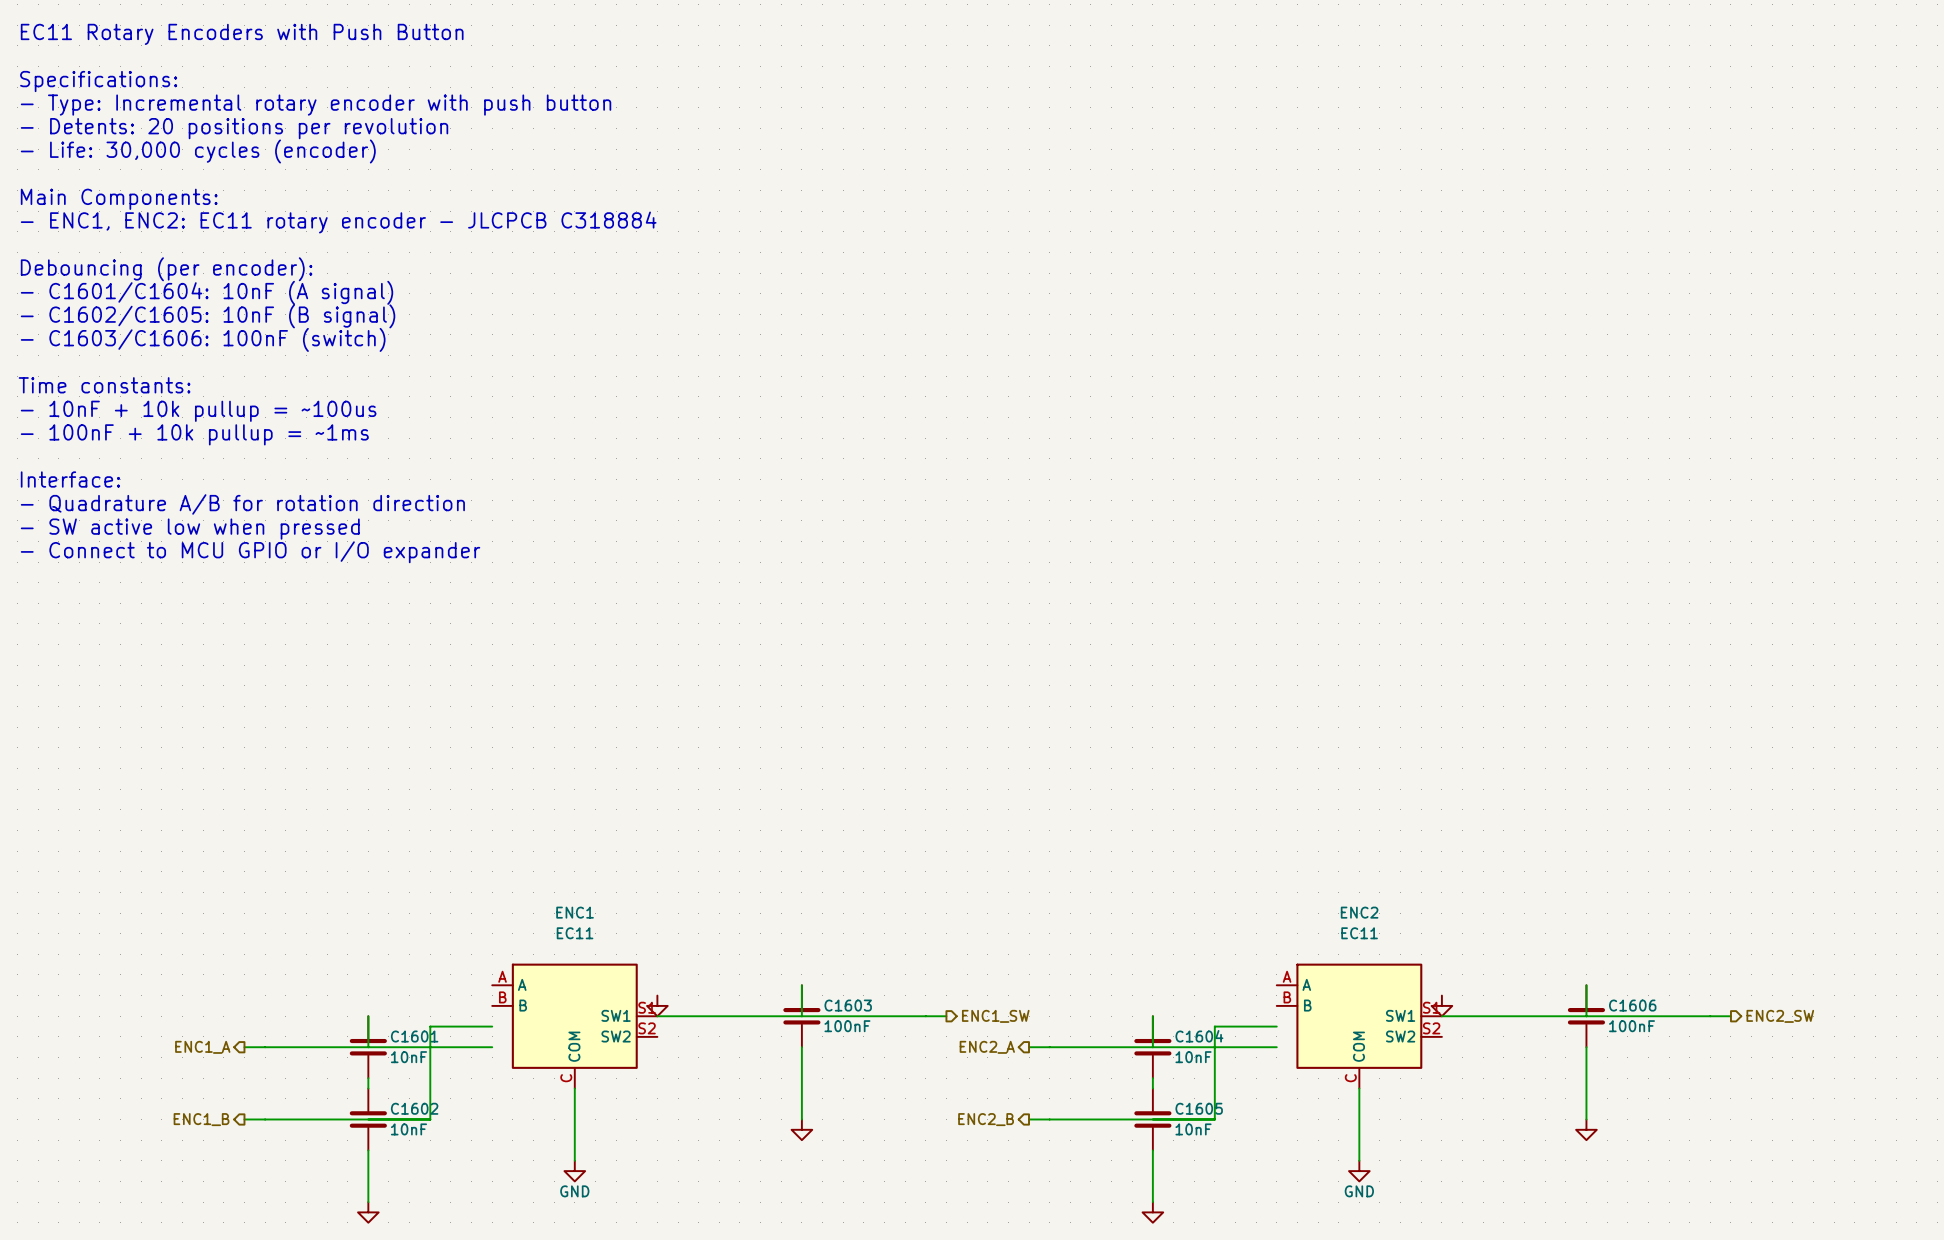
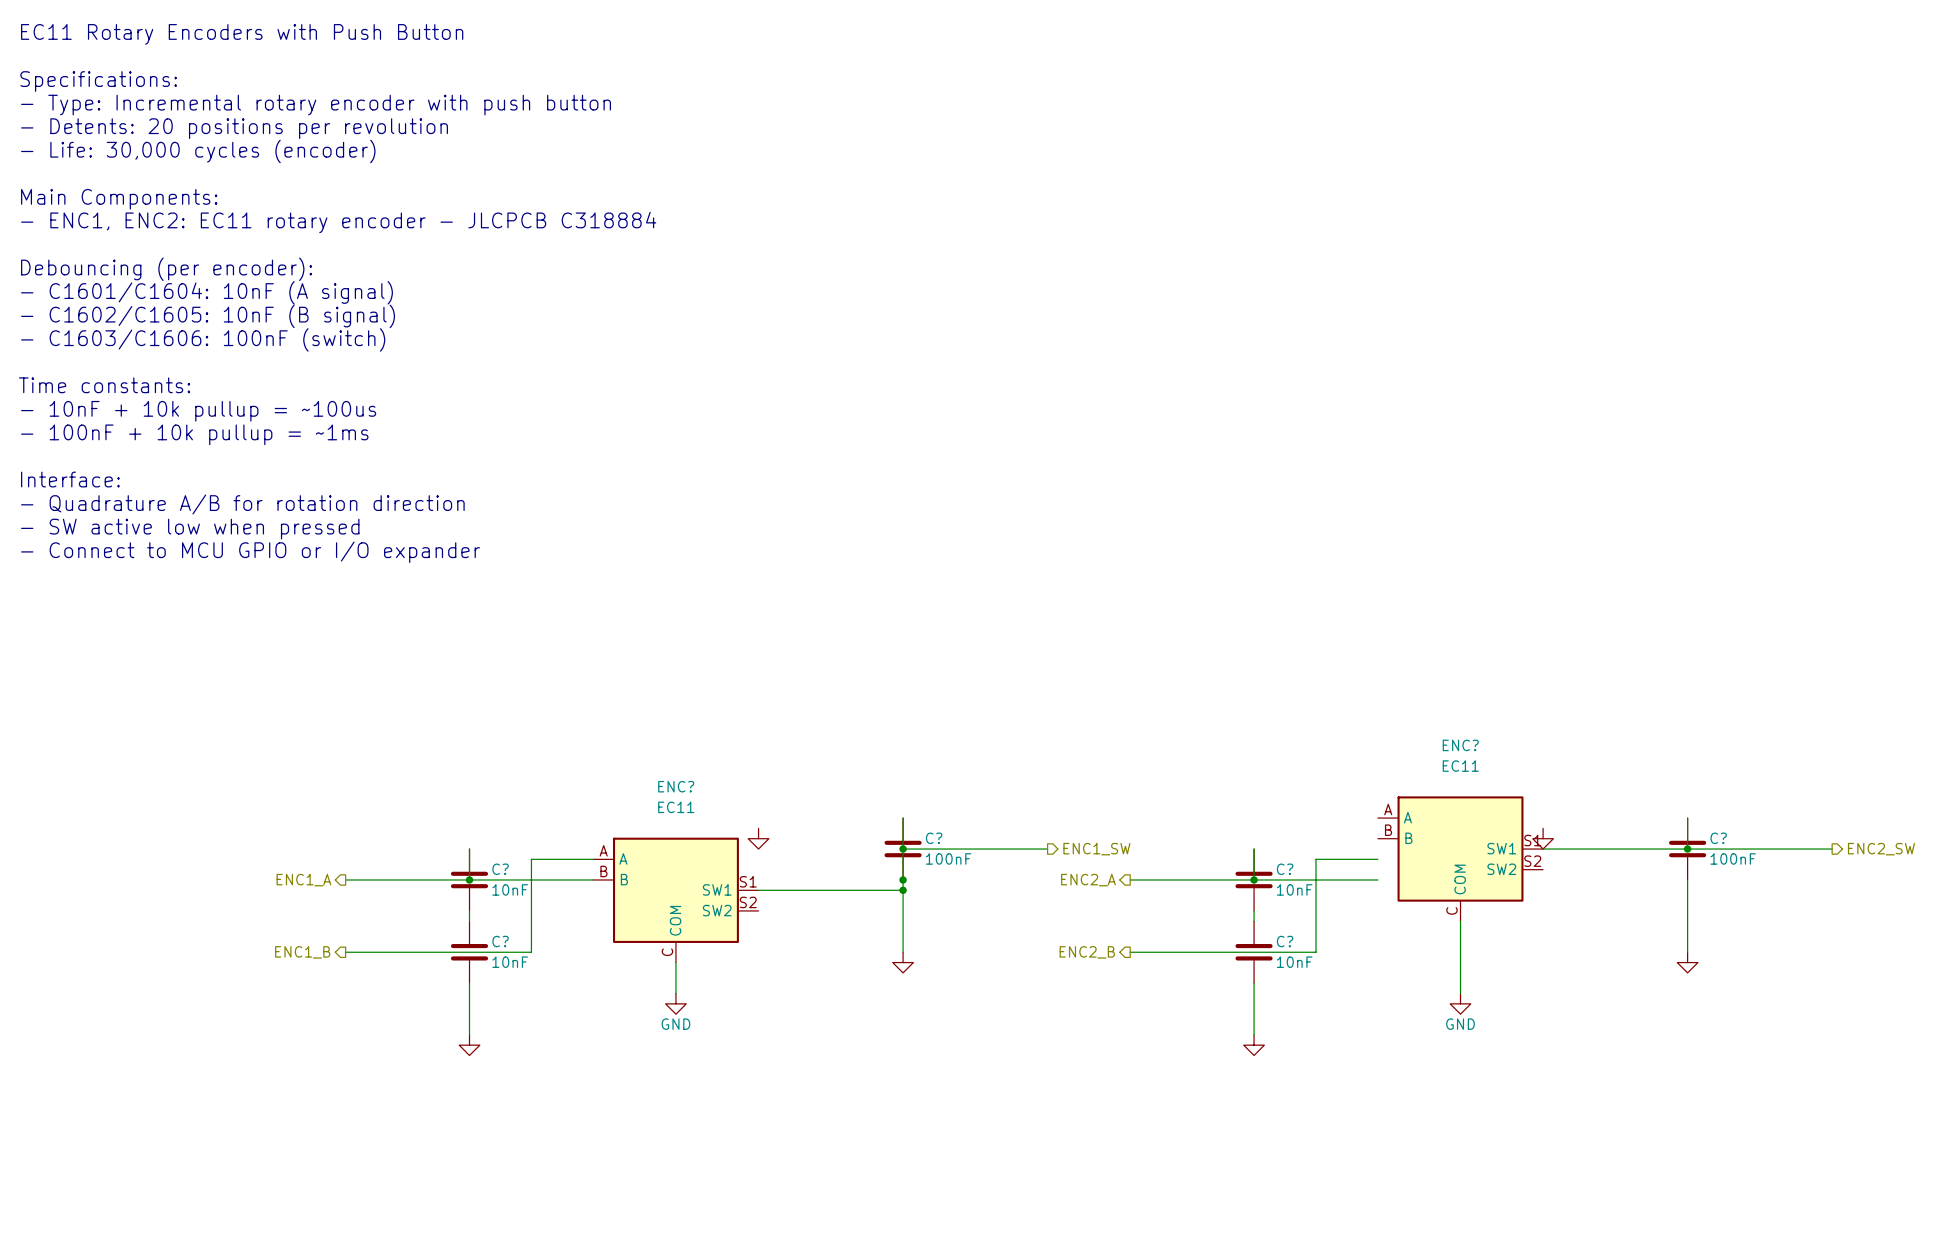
wire: none -> (903, 818) (903, 952)
power symbol: none -> (758, 838)
power symbol: none -> (1543, 838)
wire: none -> (903, 849) (1047, 849)
C?: none -> 100nF (903, 849)
junction: none -> (903, 849)
C?: none -> 100nF (1687, 849)
junction: none -> (1687, 849)
ENC?: none -> EC11 (1460, 858)
C?: none -> 10nF (469, 879)
junction: none -> (469, 879)
junction: none -> (903, 879)
C?: none -> 10nF (1254, 879)
junction: none -> (1254, 879)
wire: none -> (758, 890) (903, 890)
junction: none -> (903, 890)
ENC?: none -> EC11 (675, 900)
C?: none -> 10nF (469, 952)
C?: none -> 10nF (1254, 952)
power symbol: none -> (903, 962)
power symbol: none -> (1687, 962)
wire: (801, 985) (801, 1016) -> (675, 962) (675, 993)
wire: (1586, 985) (1586, 1016) -> (1687, 818) (1687, 849)
power symbol: (657, 1005) -> none
power symbol: (1441, 1005) -> none
wire: (368, 1016) (368, 1047) -> (469, 849) (469, 879)
wire: (657, 1016) (946, 1016) -> none
C1603: 100nF (801, 1016) -> none
hierarchical label position: ENC1_SW (995, 1016) -> ENC1_SW (1096, 849)
wire: (1152, 1016) (1152, 1047) -> (1254, 849) (1254, 879)
wire: (1441, 1016) (1730, 1016) -> (1543, 849) (1832, 849)
C1606: 100nF (1586, 1016) -> none
hierarchical label position: ENC2_SW (1780, 1016) -> ENC2_SW (1881, 849)
wire: (492, 1026) (430, 1026) (430, 1119) (244, 1119) -> (593, 859) (531, 859) (531, 952) (345, 952)
ENC1: EC11 (574, 1026) -> none
wire: (1276, 1026) (1214, 1026) (1214, 1119) (1029, 1119) -> (1377, 859) (1315, 859) (1315, 952) (1130, 952)
ENC2: EC11 (1359, 1026) -> none
power symbol: none -> (469, 1045)
power symbol: none -> (1254, 1045)
hierarchical label position: ENC1_A (202, 1047) -> ENC1_A (303, 880)
wire: (244, 1047) (492, 1047) -> (345, 879) (593, 879)
C1601: 10nF (368, 1047) -> none
wire: (801, 1047) (801, 1119) -> none
hierarchical label position: ENC2_A (987, 1047) -> ENC2_A (1088, 880)
wire: (1029, 1047) (1276, 1047) -> (1130, 879) (1377, 879)
C1604: 10nF (1152, 1047) -> none
wire: (1586, 1047) (1586, 1119) -> (1687, 879) (1687, 952)
wire: (368, 1078) (368, 1088) -> (469, 910) (469, 921)
wire: (1152, 1078) (1152, 1088) -> (1254, 910) (1254, 921)
wire: (574, 1088) (574, 1160) -> none
wire: (1359, 1088) (1359, 1160) -> (1460, 921) (1460, 993)
hierarchical label position: ENC1_B (201, 1119) -> ENC1_B (302, 952)
C1602: 10nF (368, 1119) -> none
hierarchical label position: ENC2_B (986, 1119) -> ENC2_B (1087, 952)
C1605: 10nF (1152, 1119) -> none
power symbol: (801, 1129) -> none
power symbol: (1586, 1129) -> none
wire: (368, 1150) (368, 1202) -> (469, 983) (469, 1034)
wire: (1152, 1150) (1152, 1202) -> (1254, 983) (1254, 1034)
power symbol position: GND (574, 1171) -> GND (675, 1003)
power symbol position: GND (1359, 1171) -> GND (1460, 1003)
power symbol: (368, 1212) -> none
power symbol: (1152, 1212) -> none

